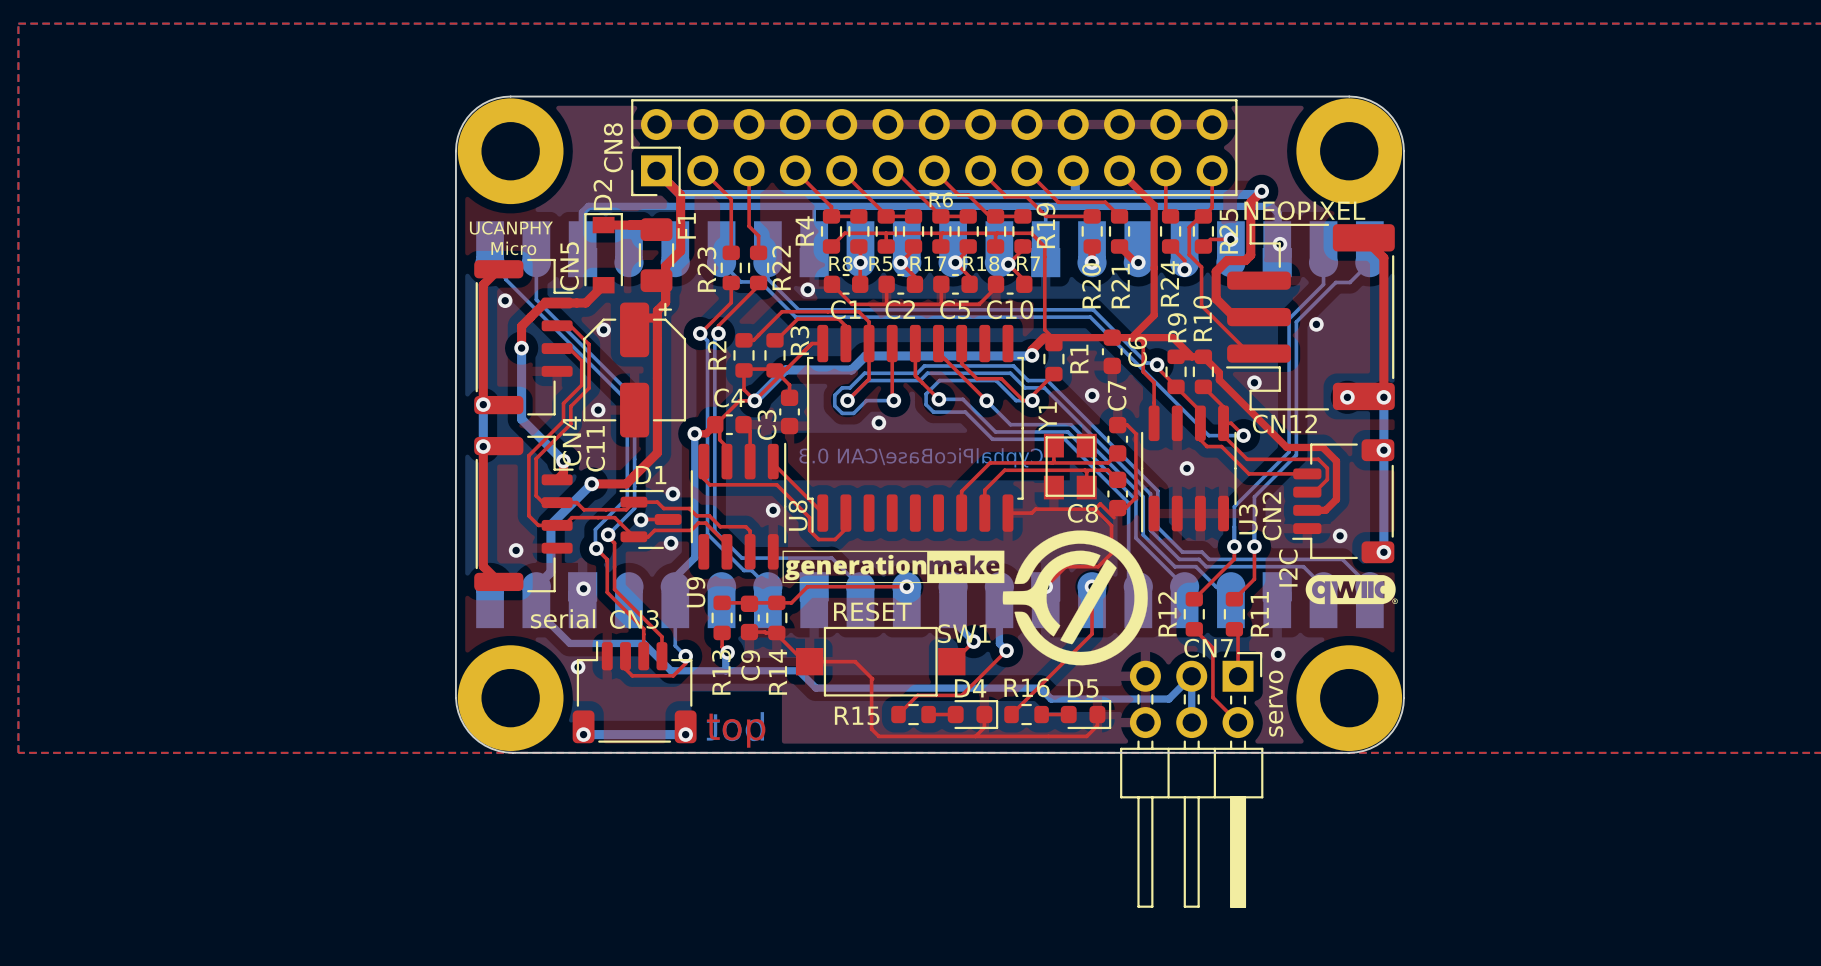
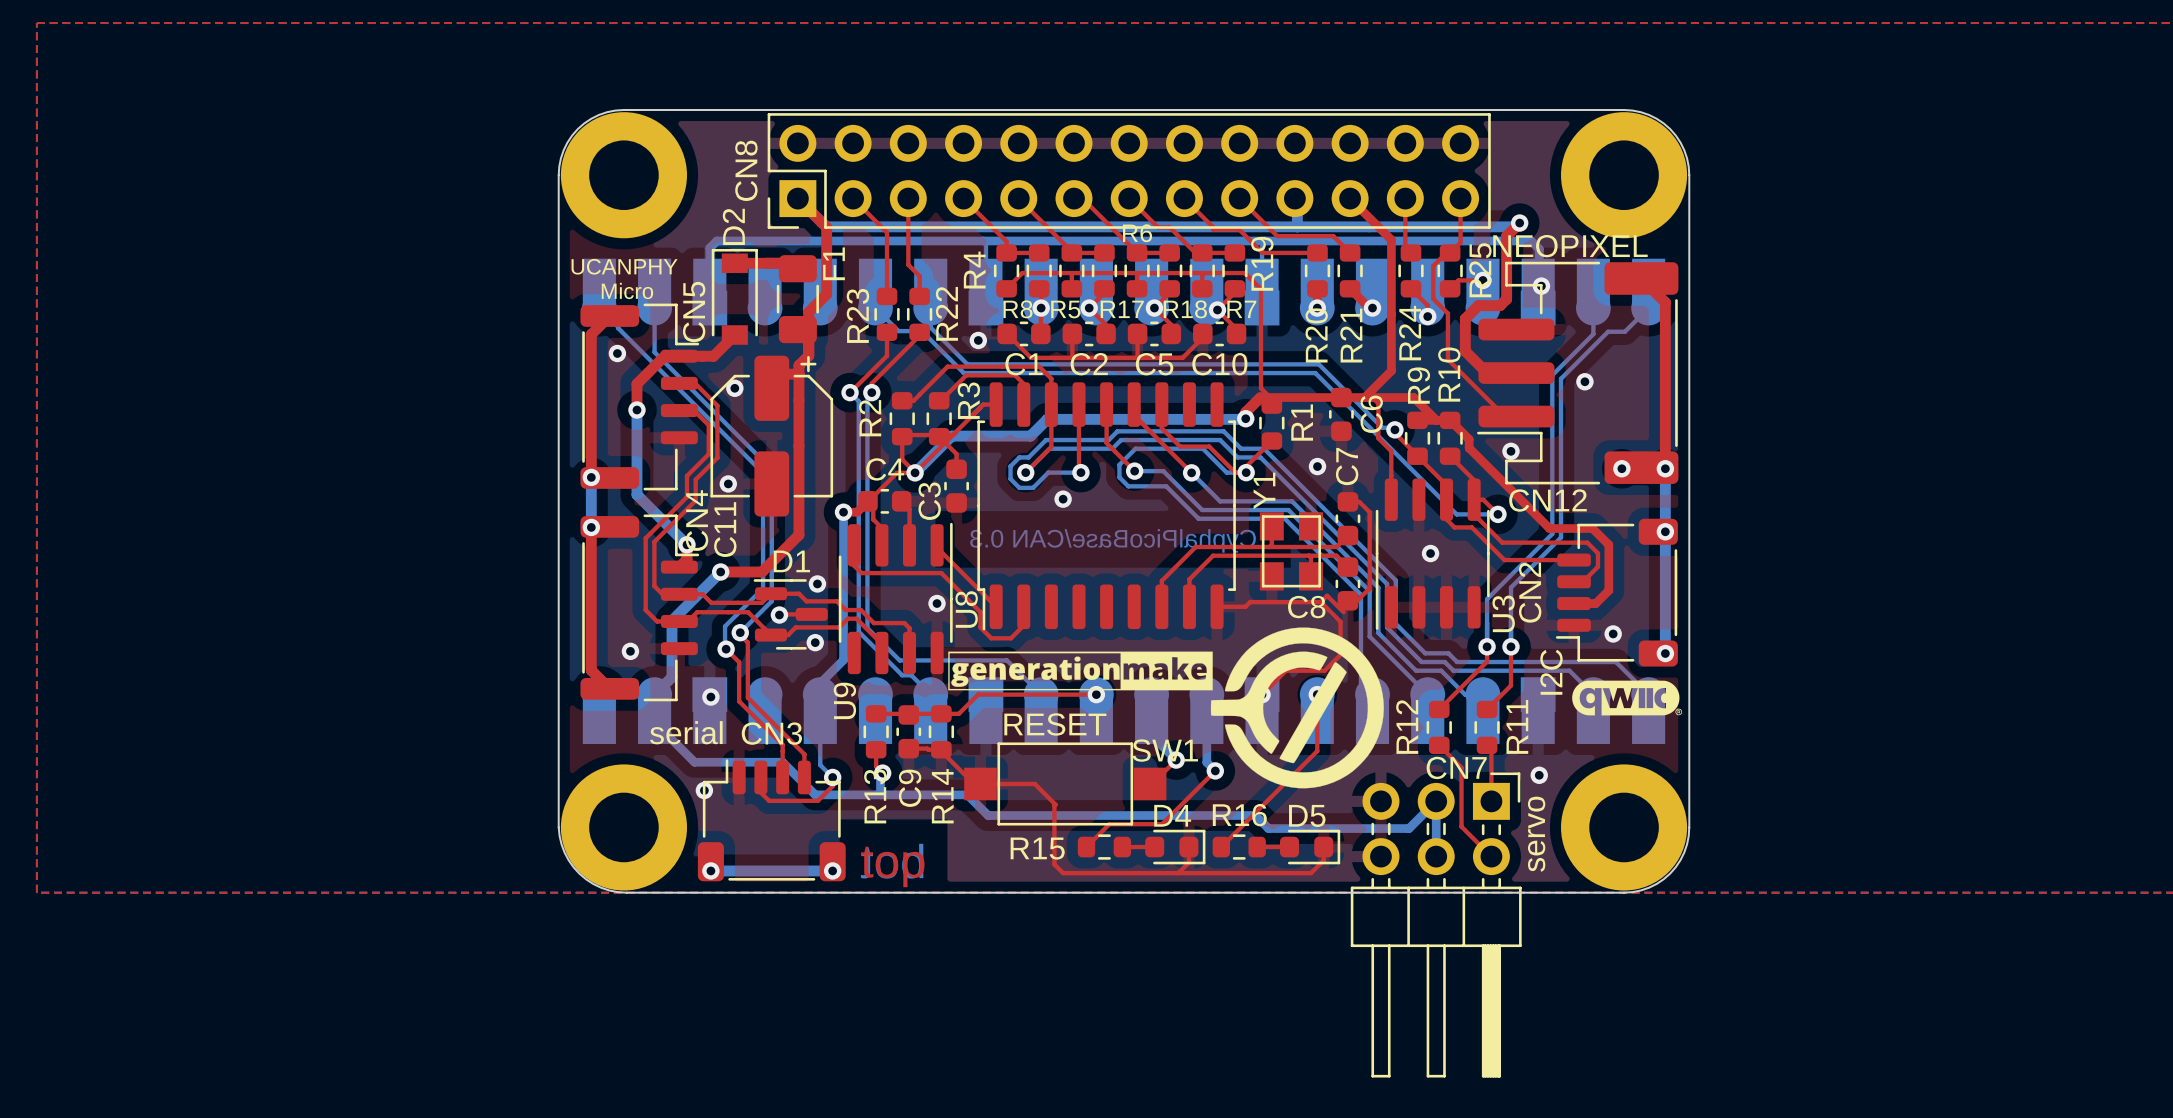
CN2 name position: CN2 (1272, 516) -> CN2 (1530, 592)

